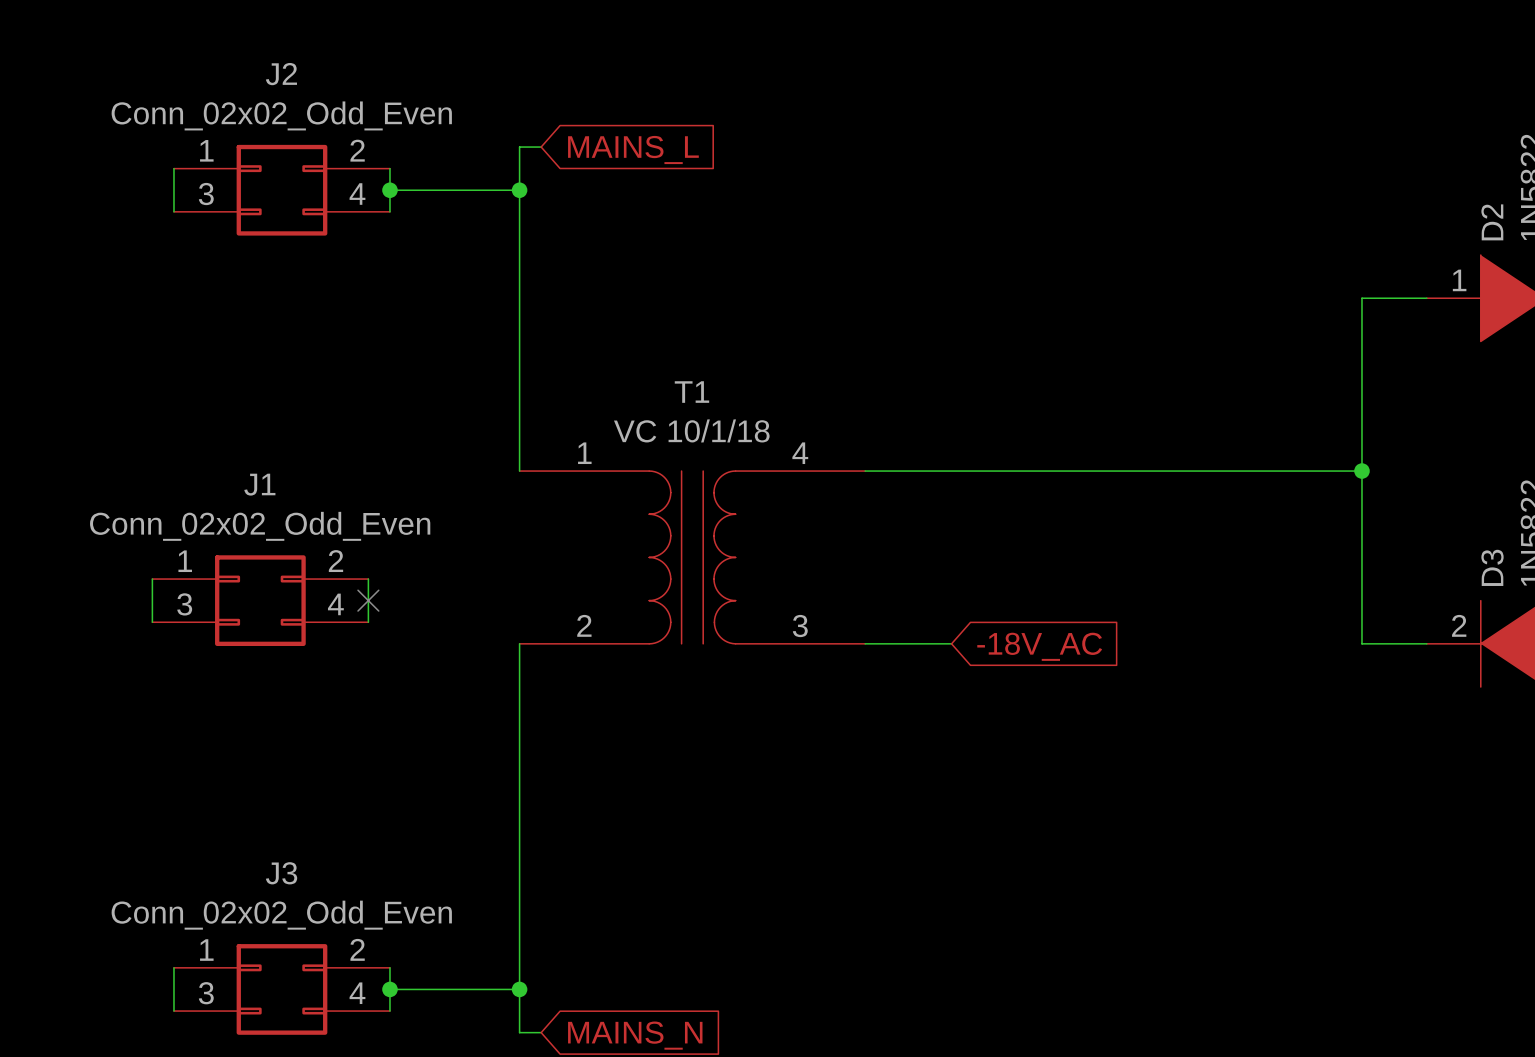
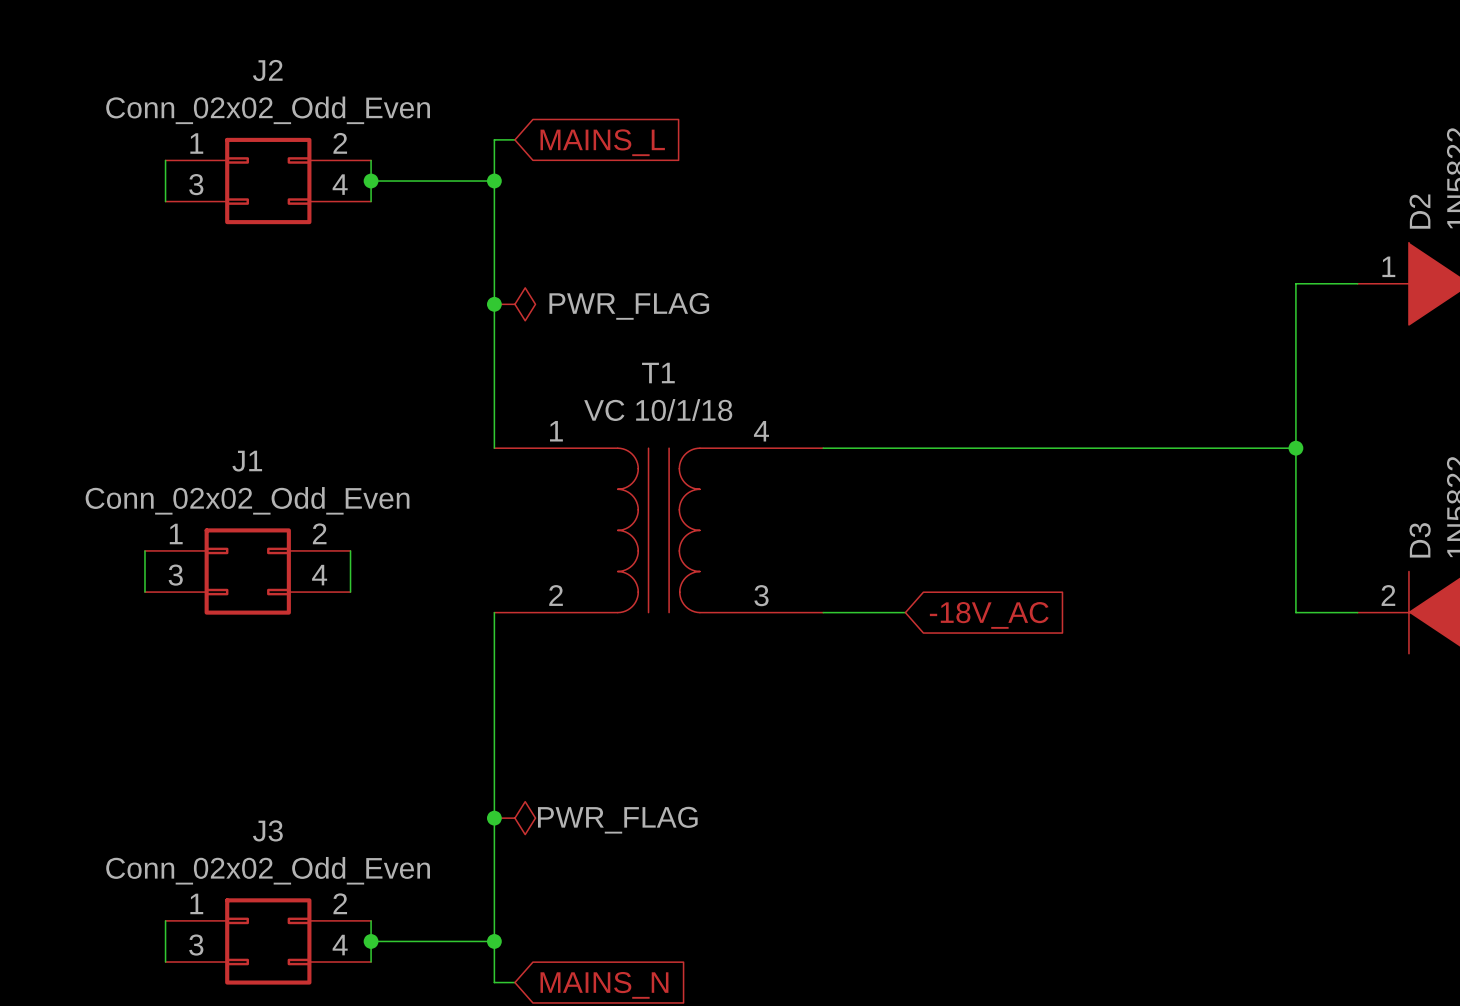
junction: none -> (494, 304)
power symbol: none -> PWR_FLAG (514, 304)
no-connect mark: (368, 600) -> none
junction: none -> (494, 818)
power symbol: none -> PWR_FLAG (514, 818)

